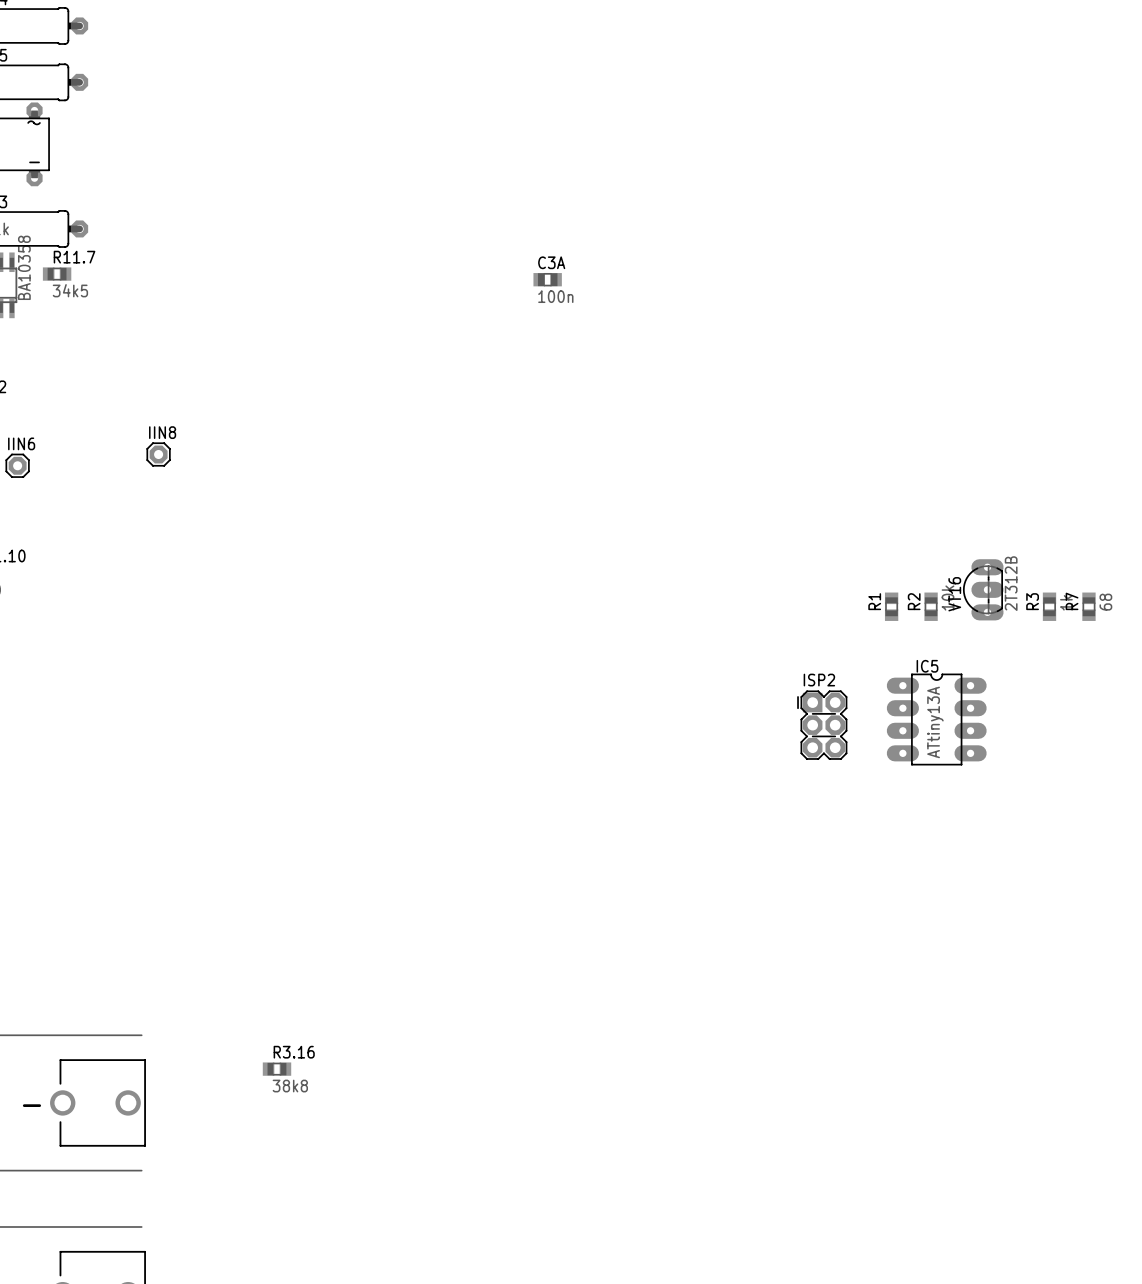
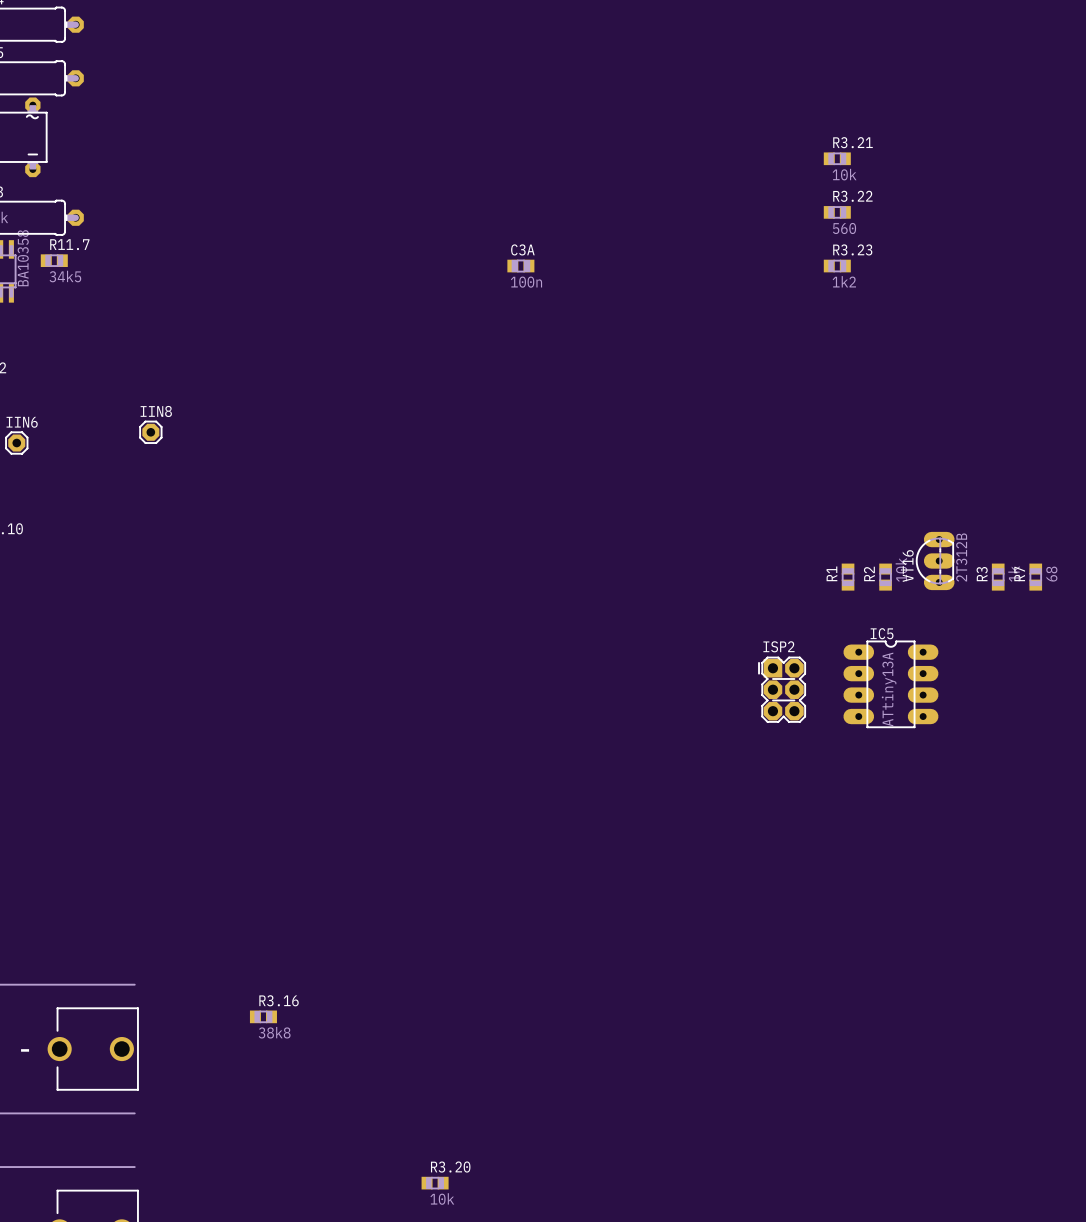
R3.21: none -> 10k (837, 158)
R3.22: none -> 560 (837, 212)
R3.23: none -> 1k2 (837, 266)
R3.20: none -> 10k (435, 1183)

